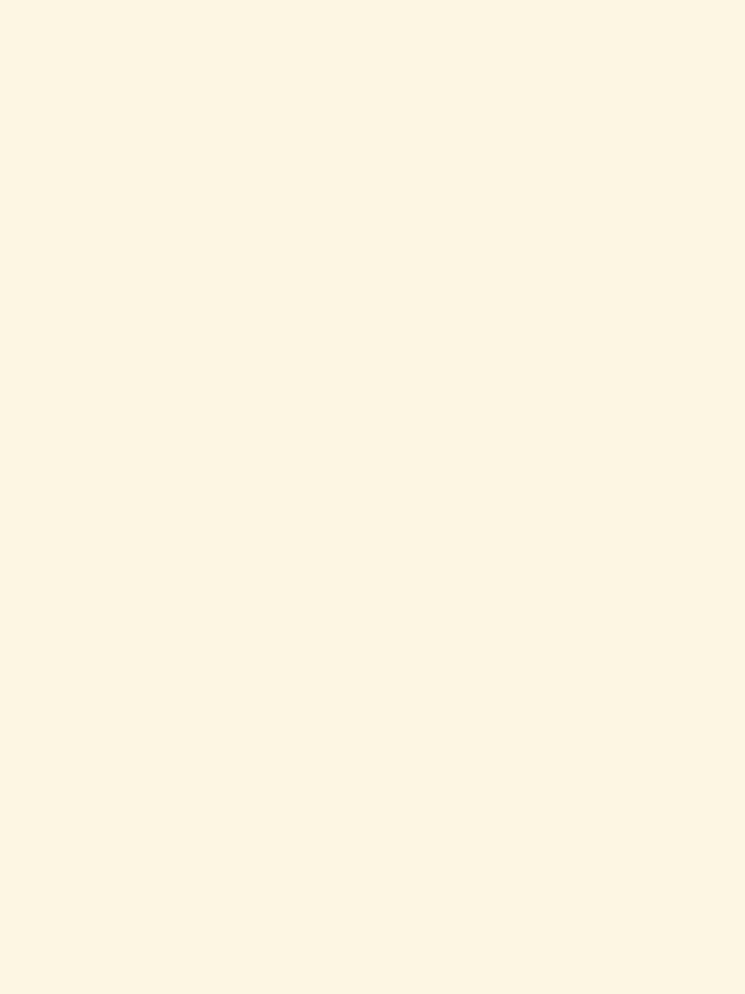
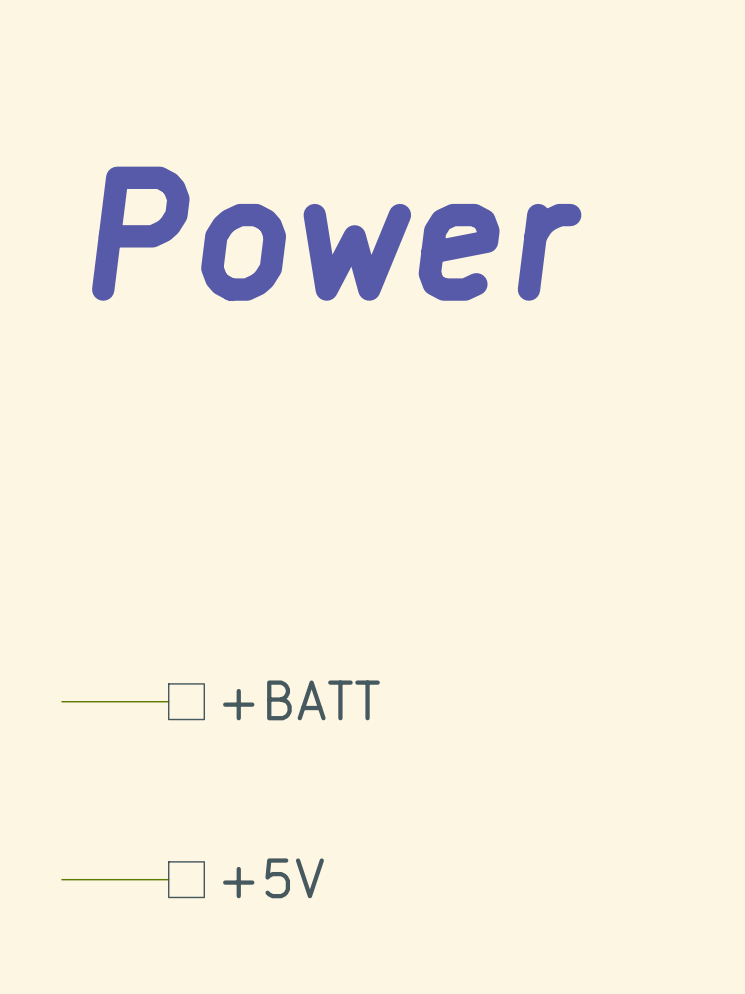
text: none -> Power (336, 233)
sheet pin: none -> +BATT (301, 700)
wire: none -> (61, 701) (168, 701)
sheet pin: none -> +5V (273, 878)
wire: none -> (61, 879) (168, 879)

